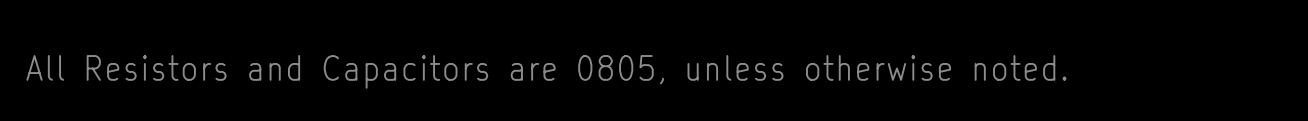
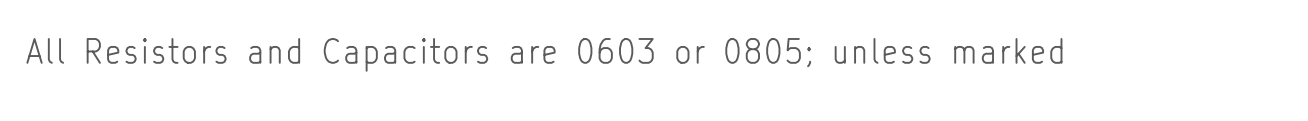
text: All Resistors and Capacitors are 0805, unless otherwise noted. (546, 71) -> All Resistors and Capacitors are 0603 or 0805; unless marked (544, 54)

